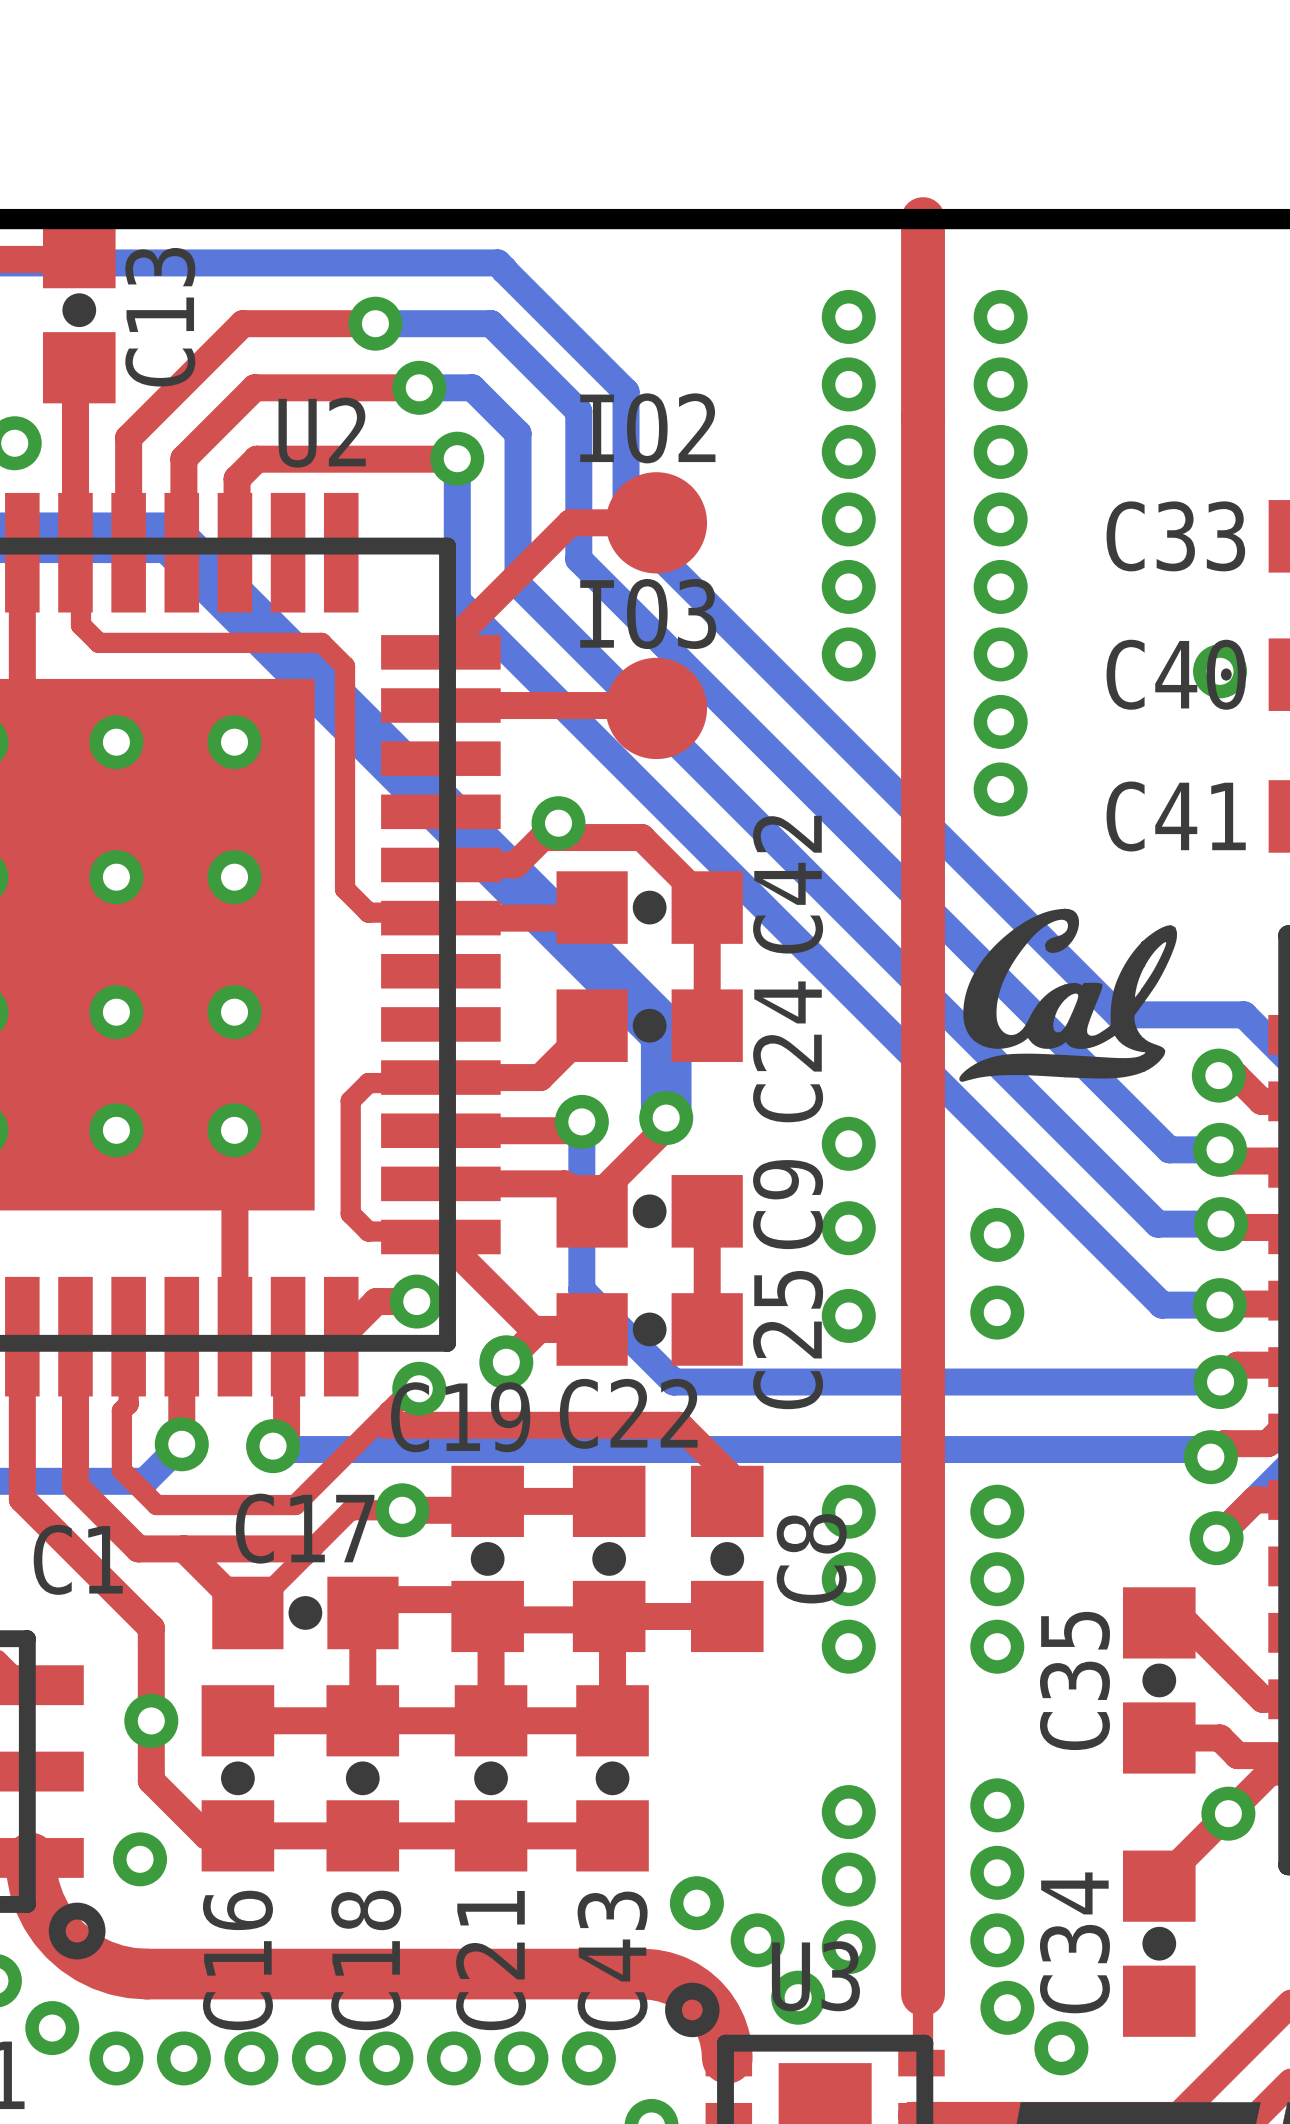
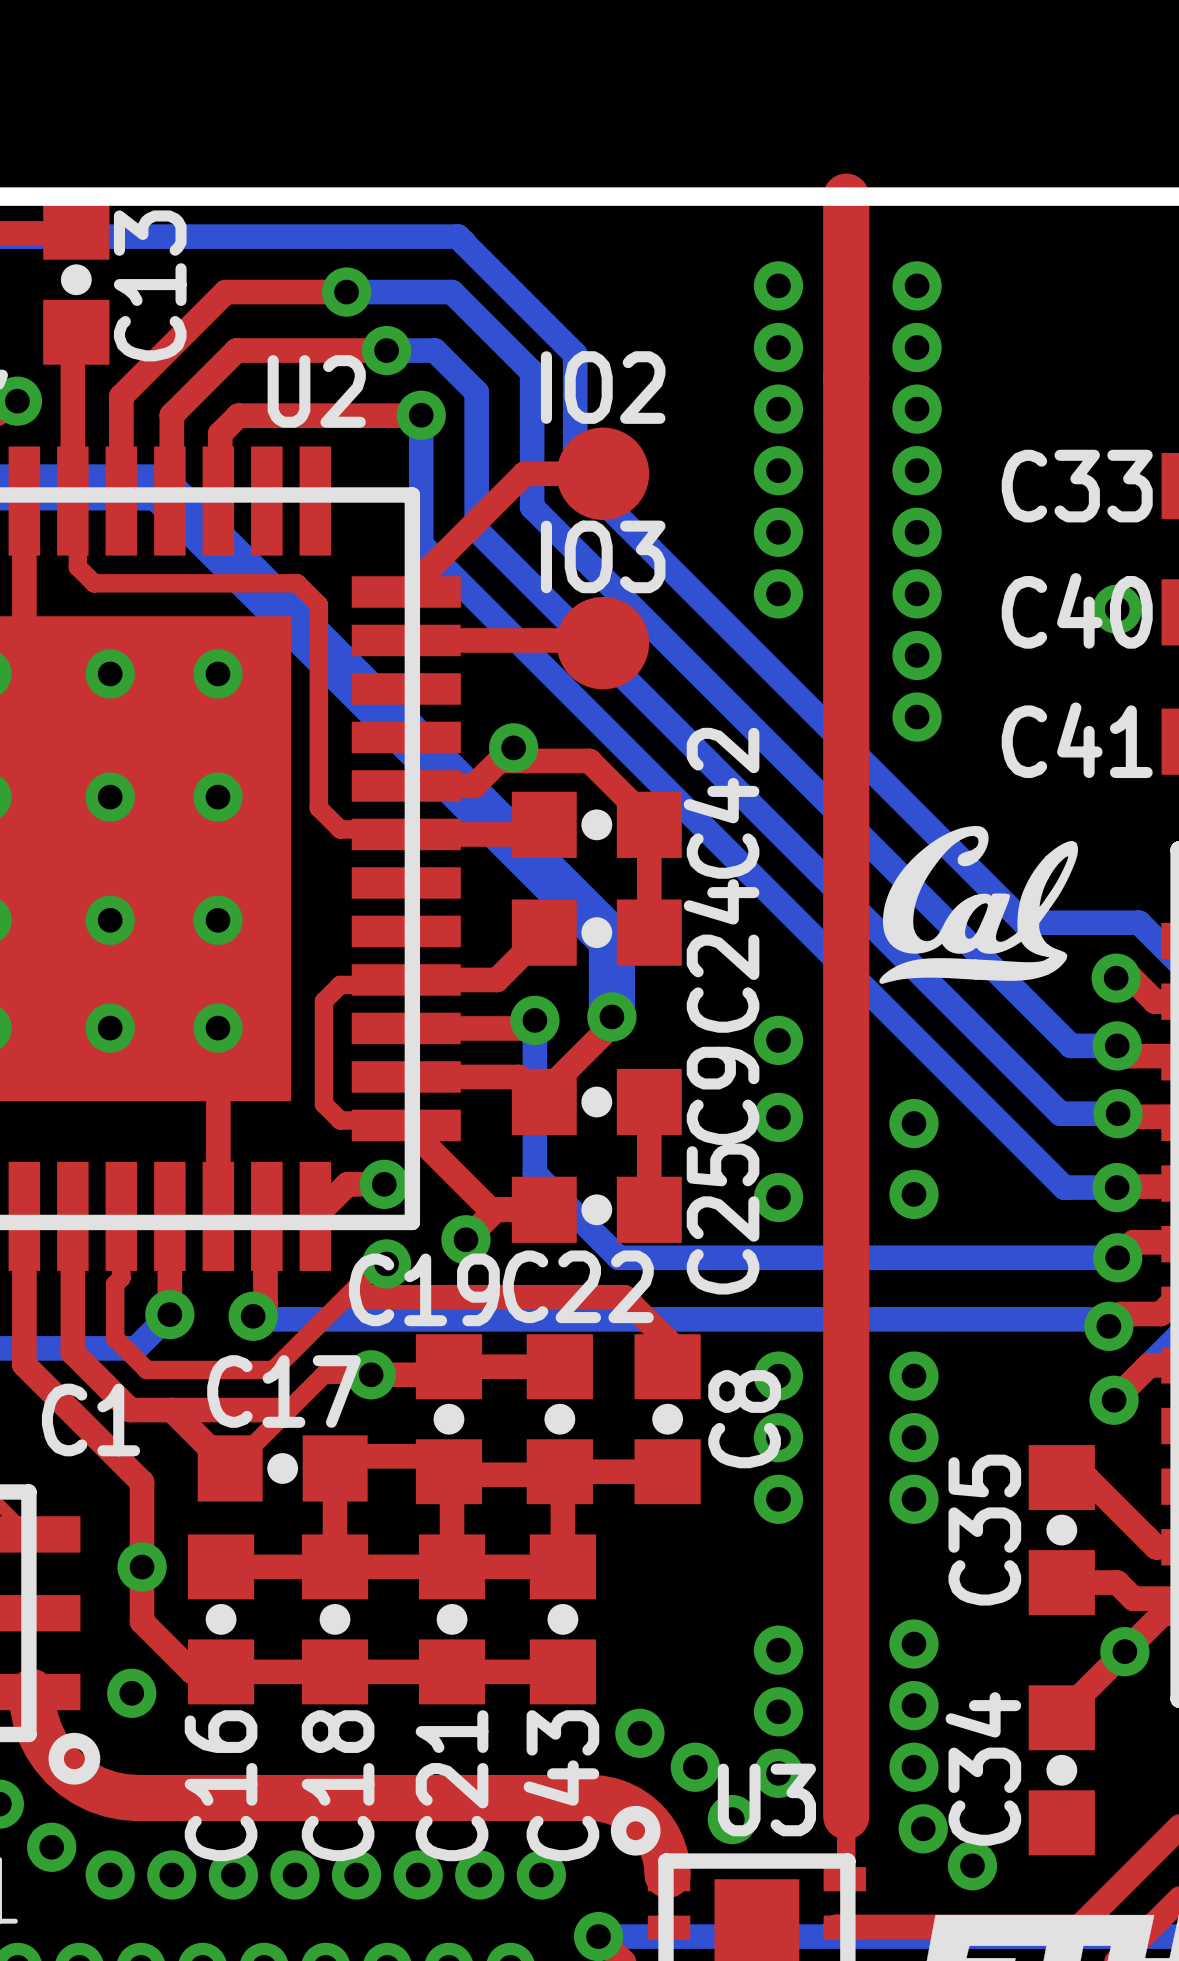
top track width: thin (923, 219) (923, 1994) -> thick (846, 196) (846, 1816)

